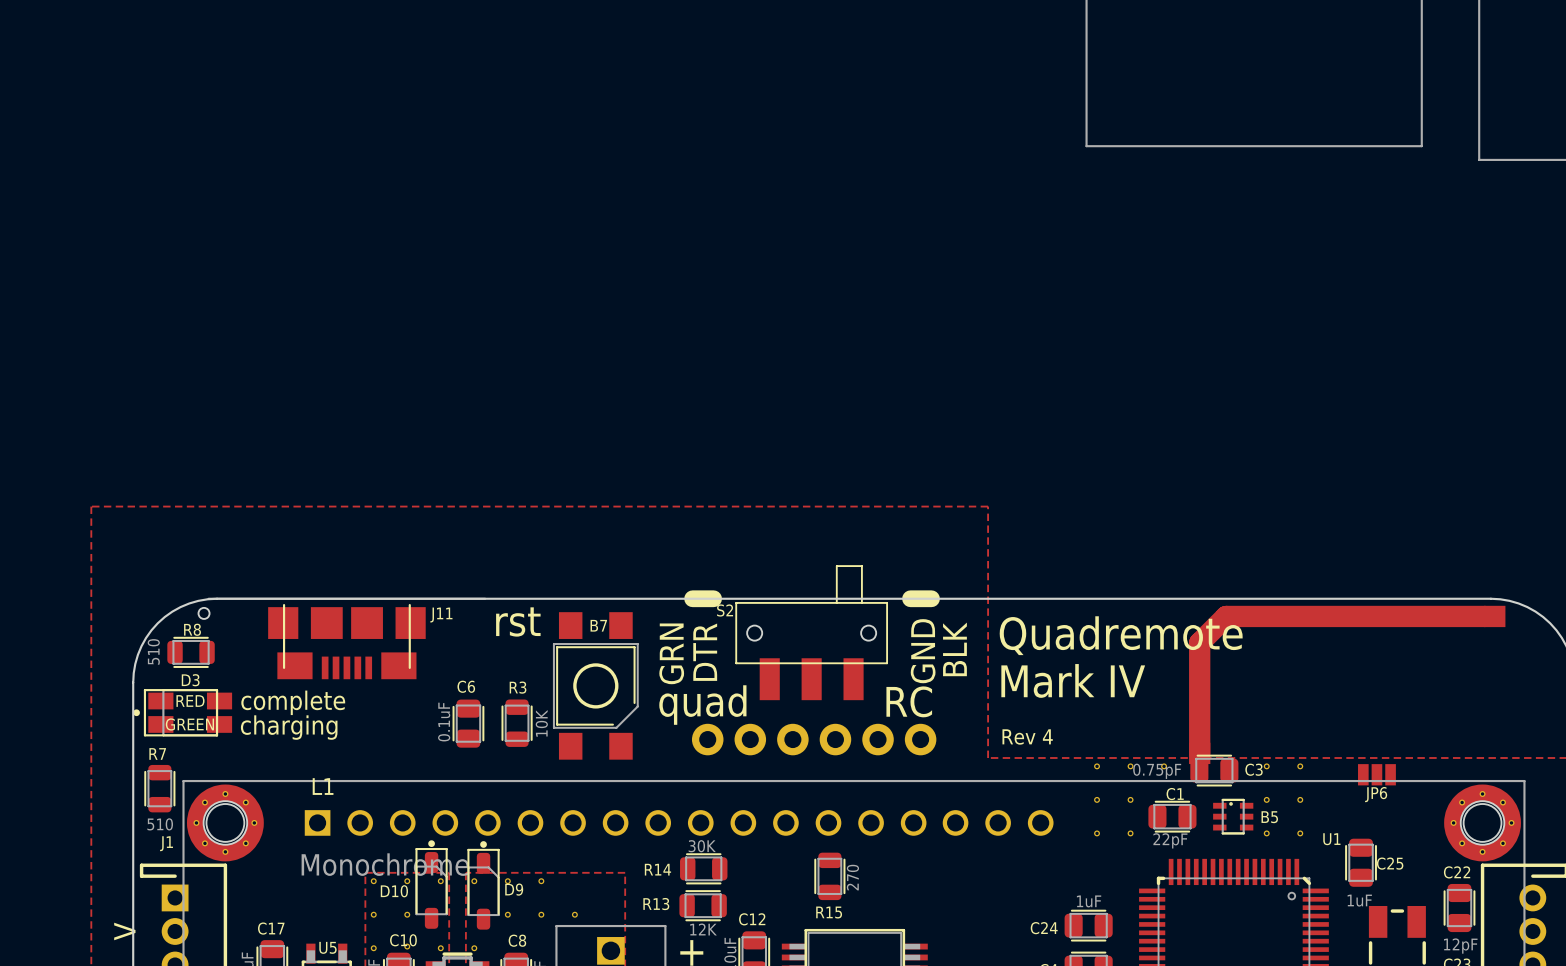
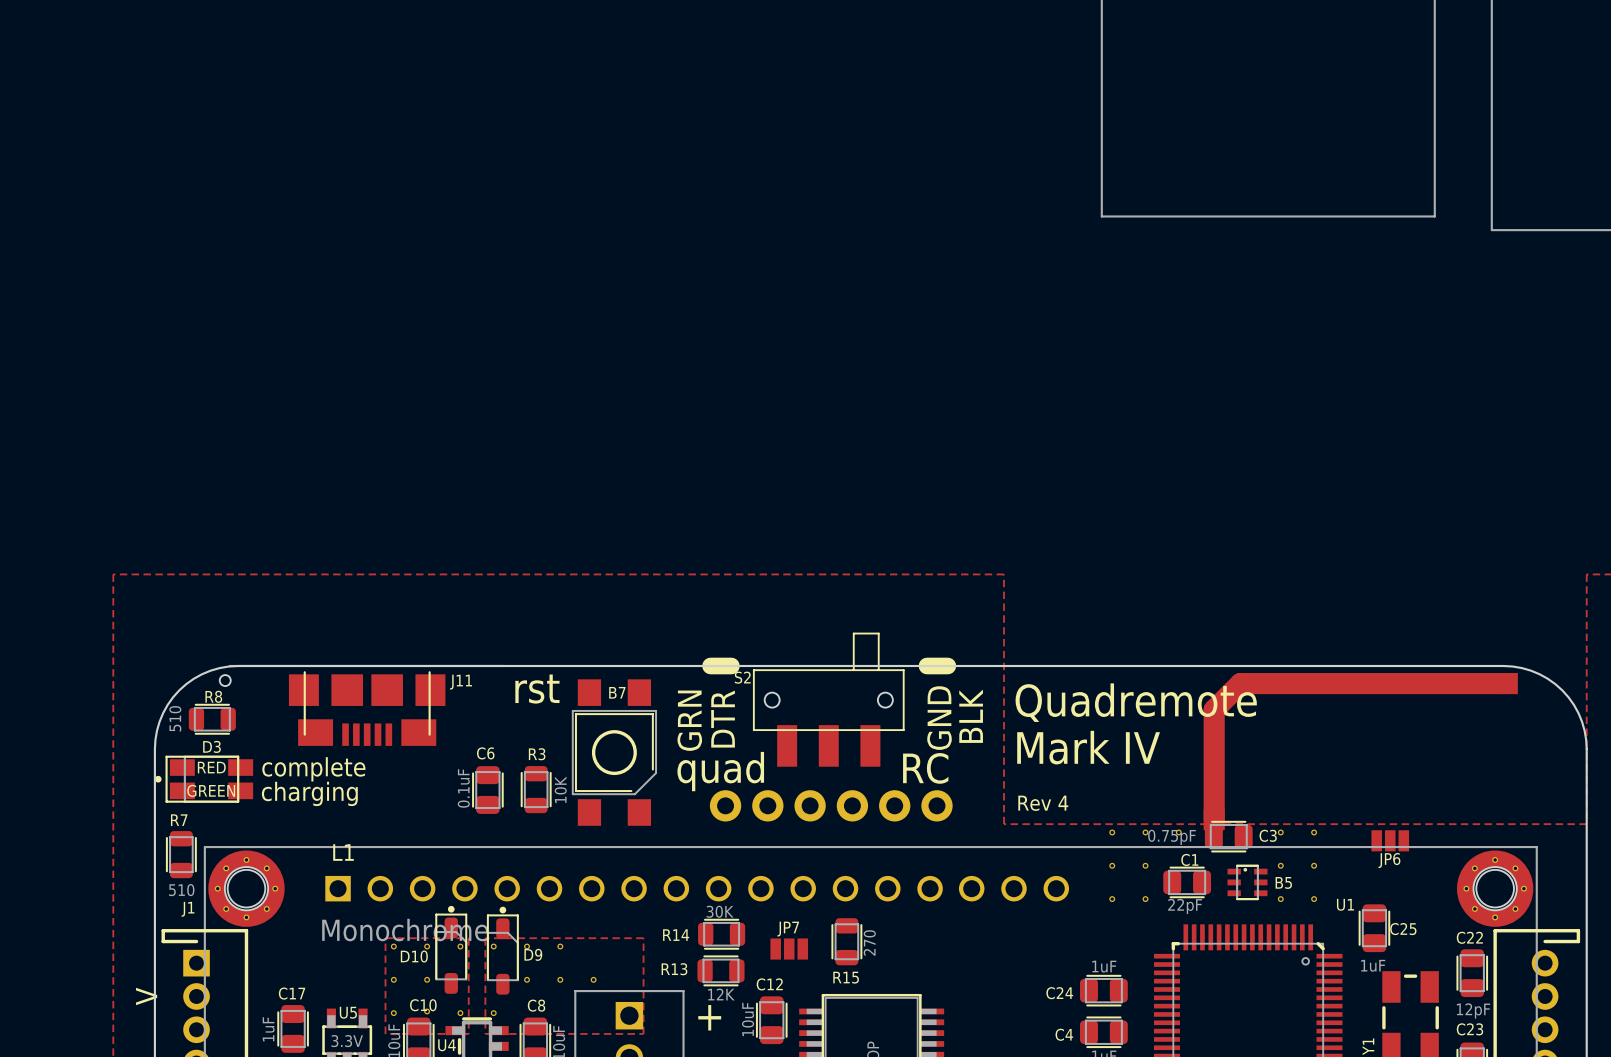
JP7: none -> (789, 949)

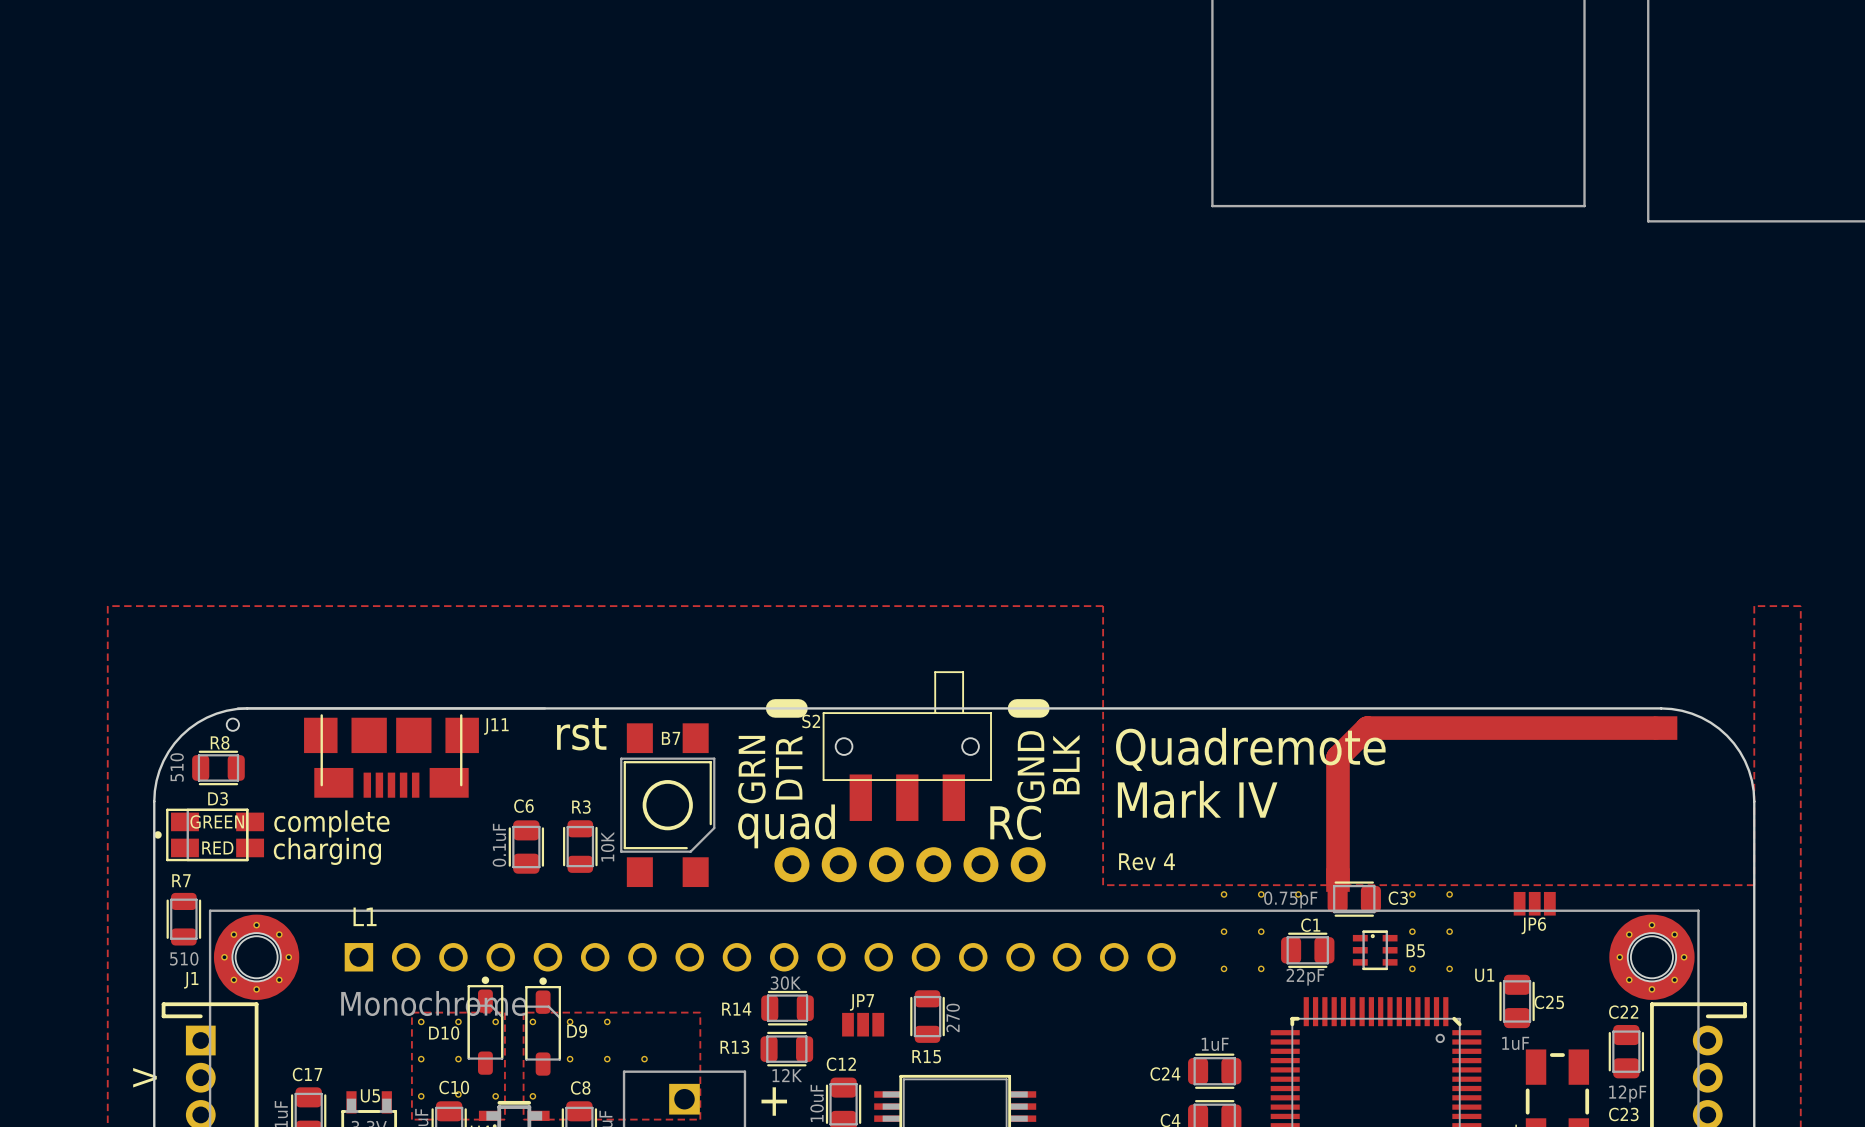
D3 text: RED (211, 767) -> GREEN (217, 821)
D3 text: GREEN (211, 790) -> RED (217, 847)

